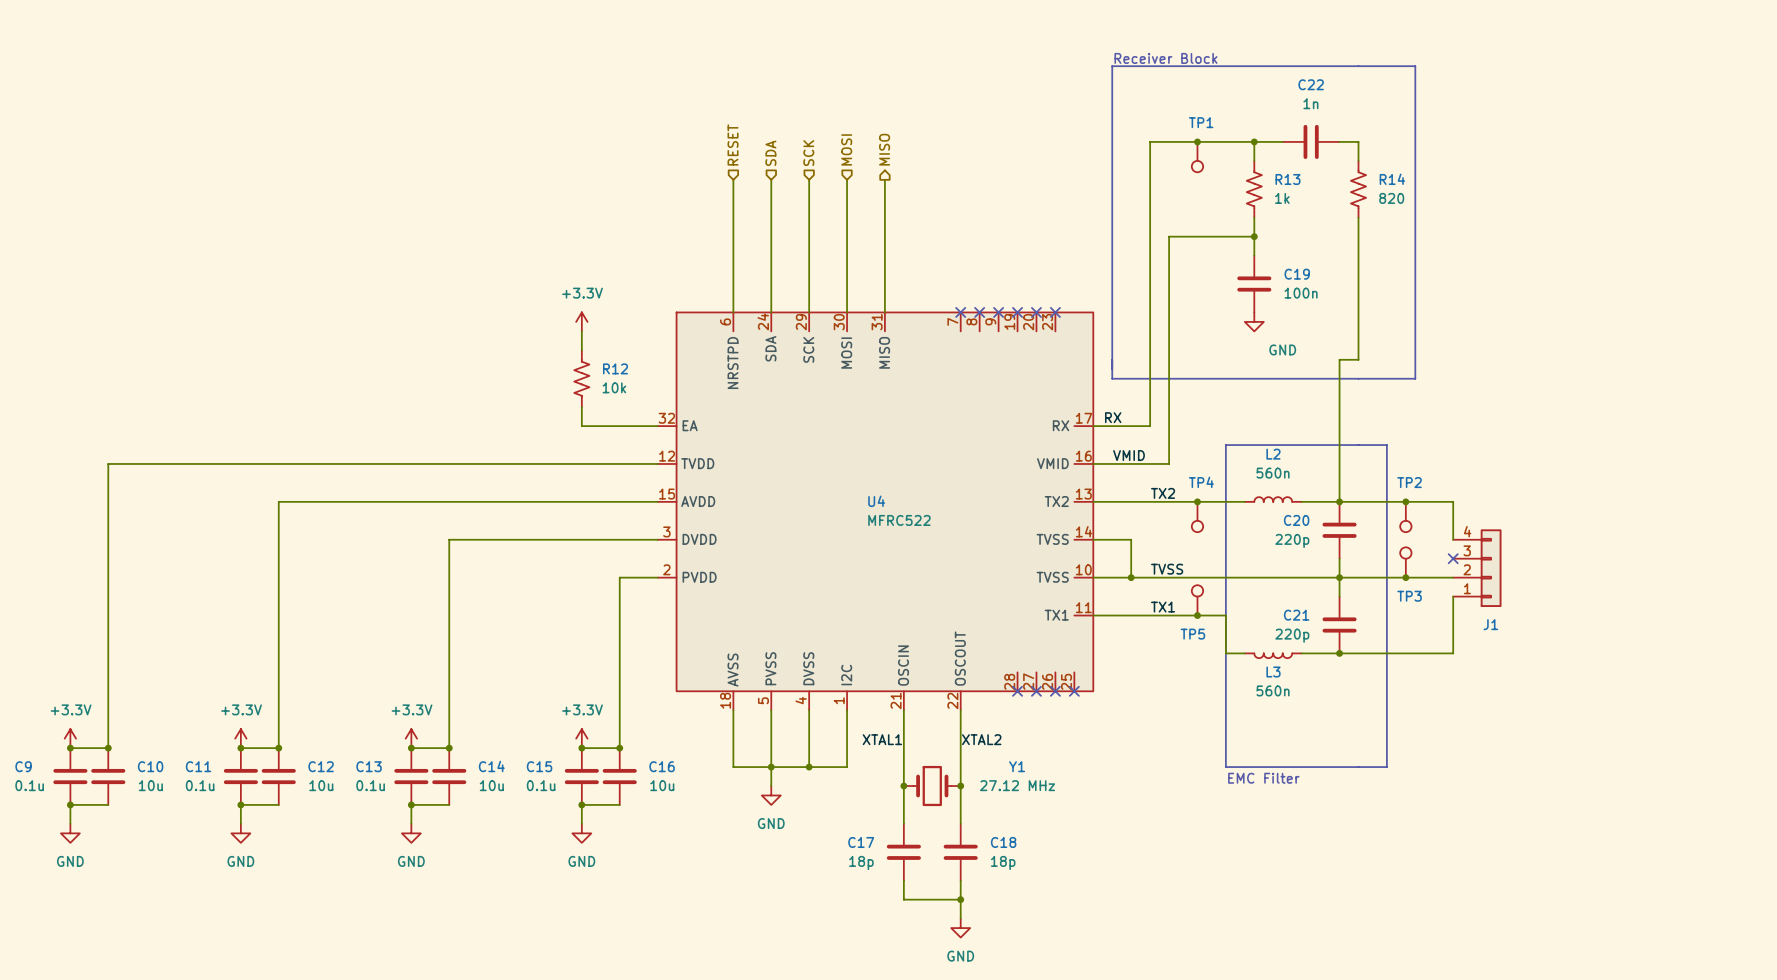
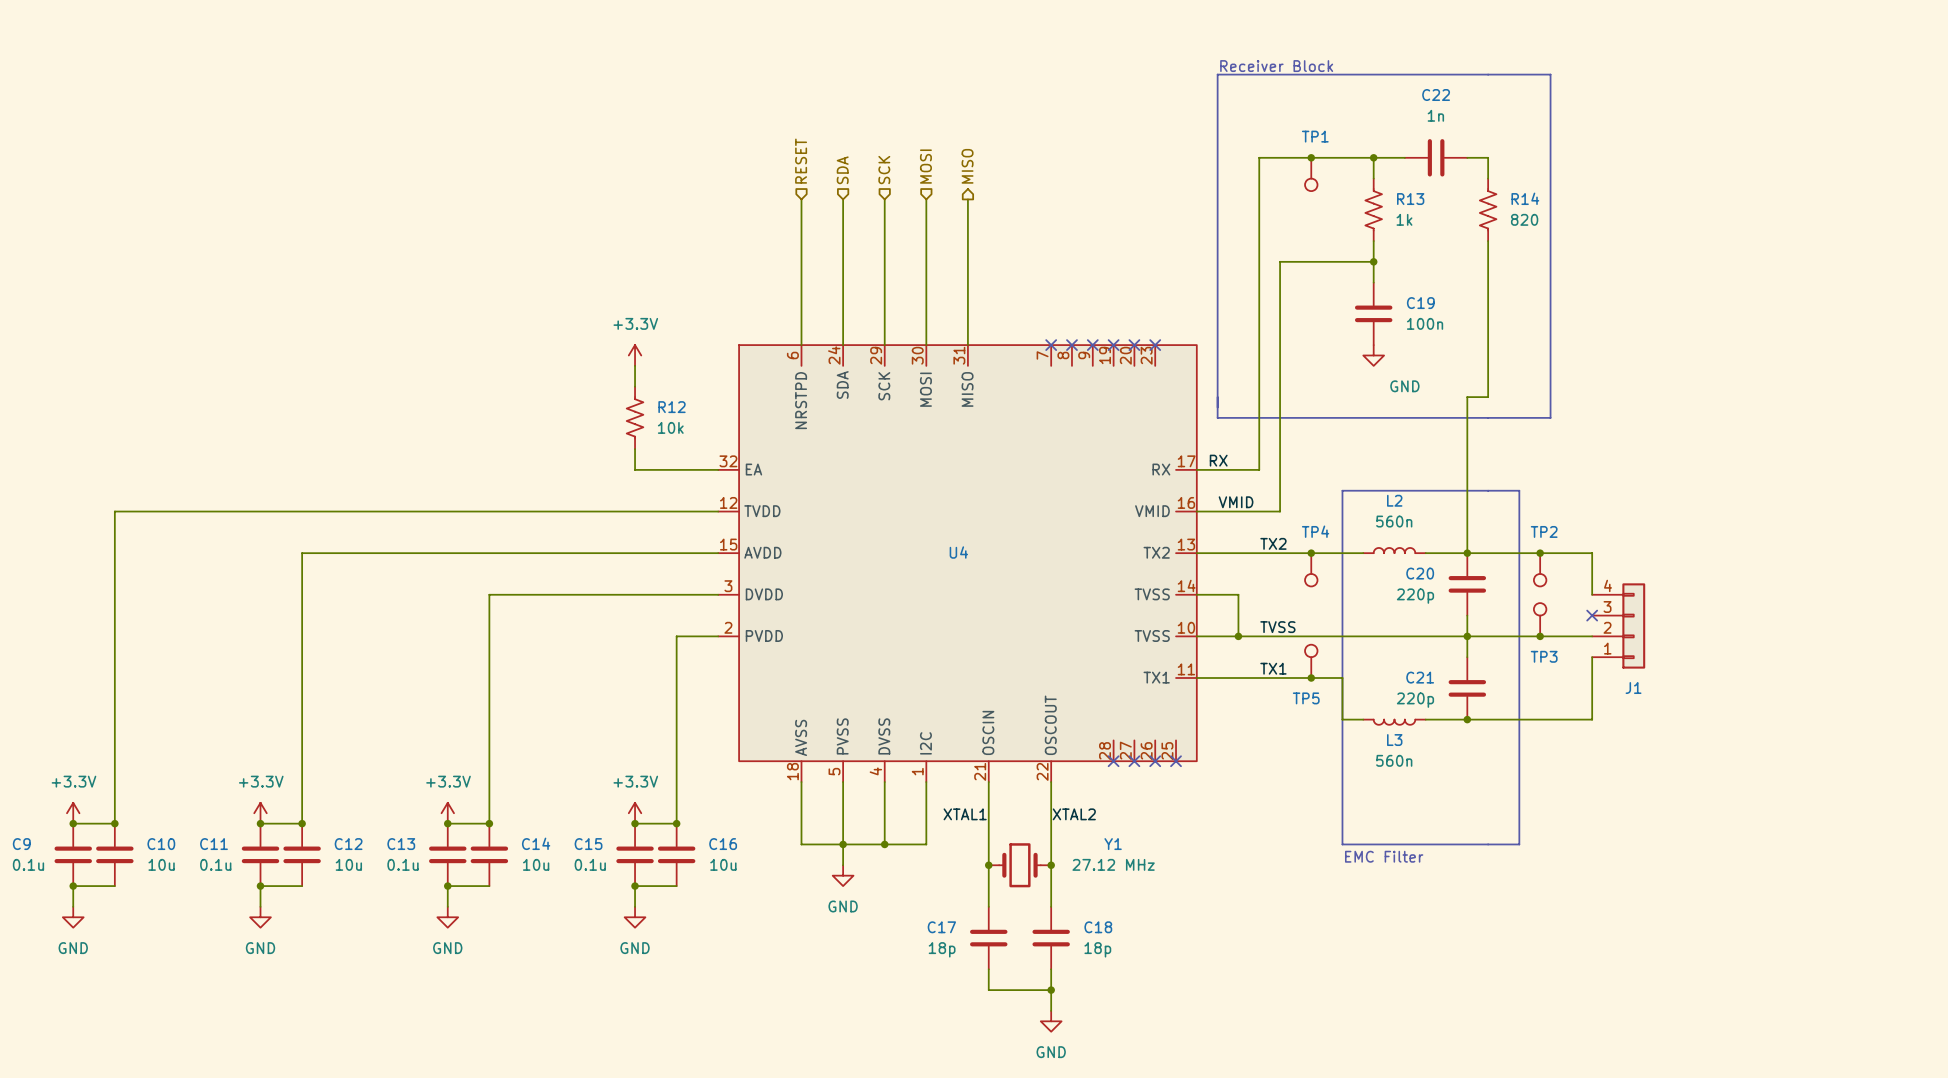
U4 value: MFRC522 (899, 520) -> none

